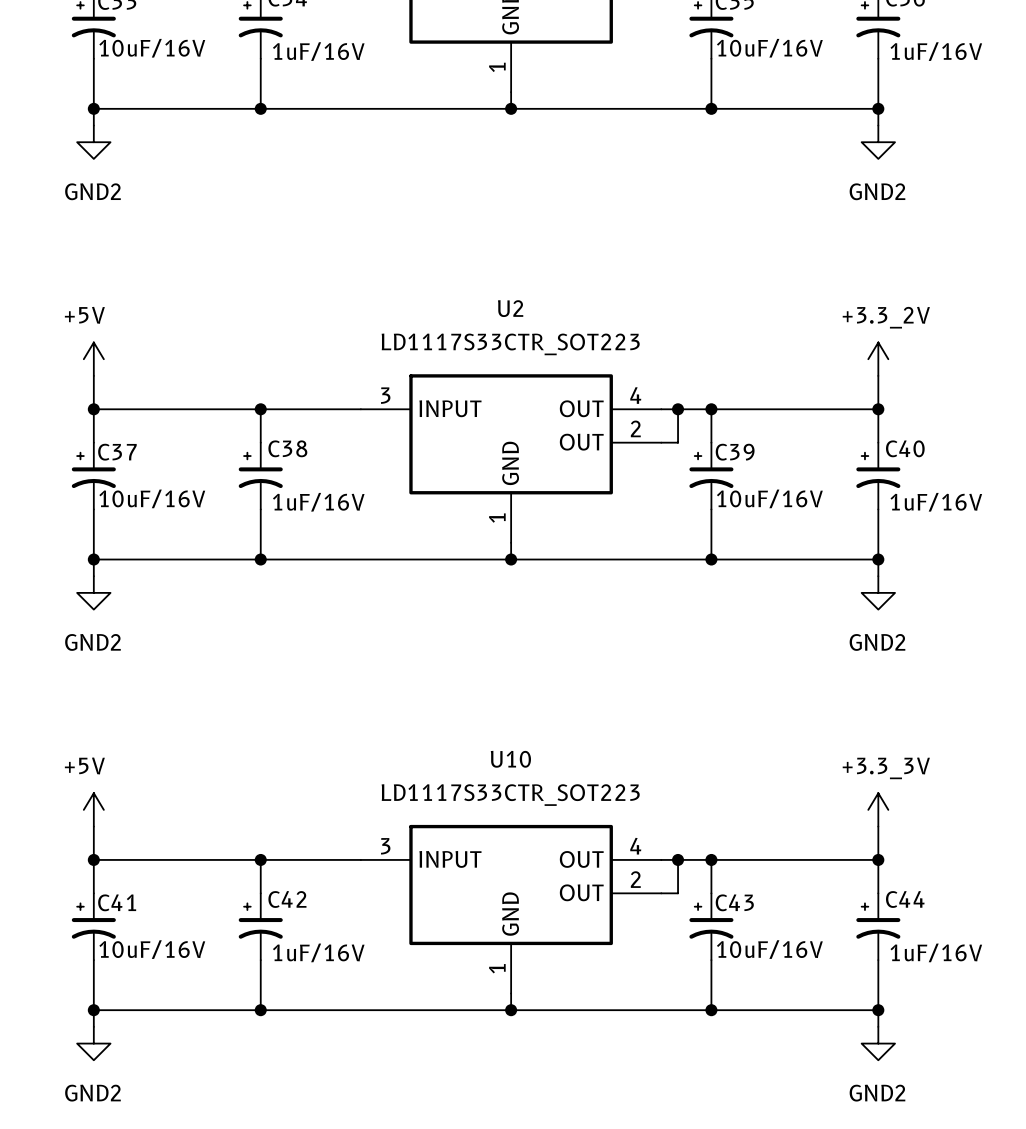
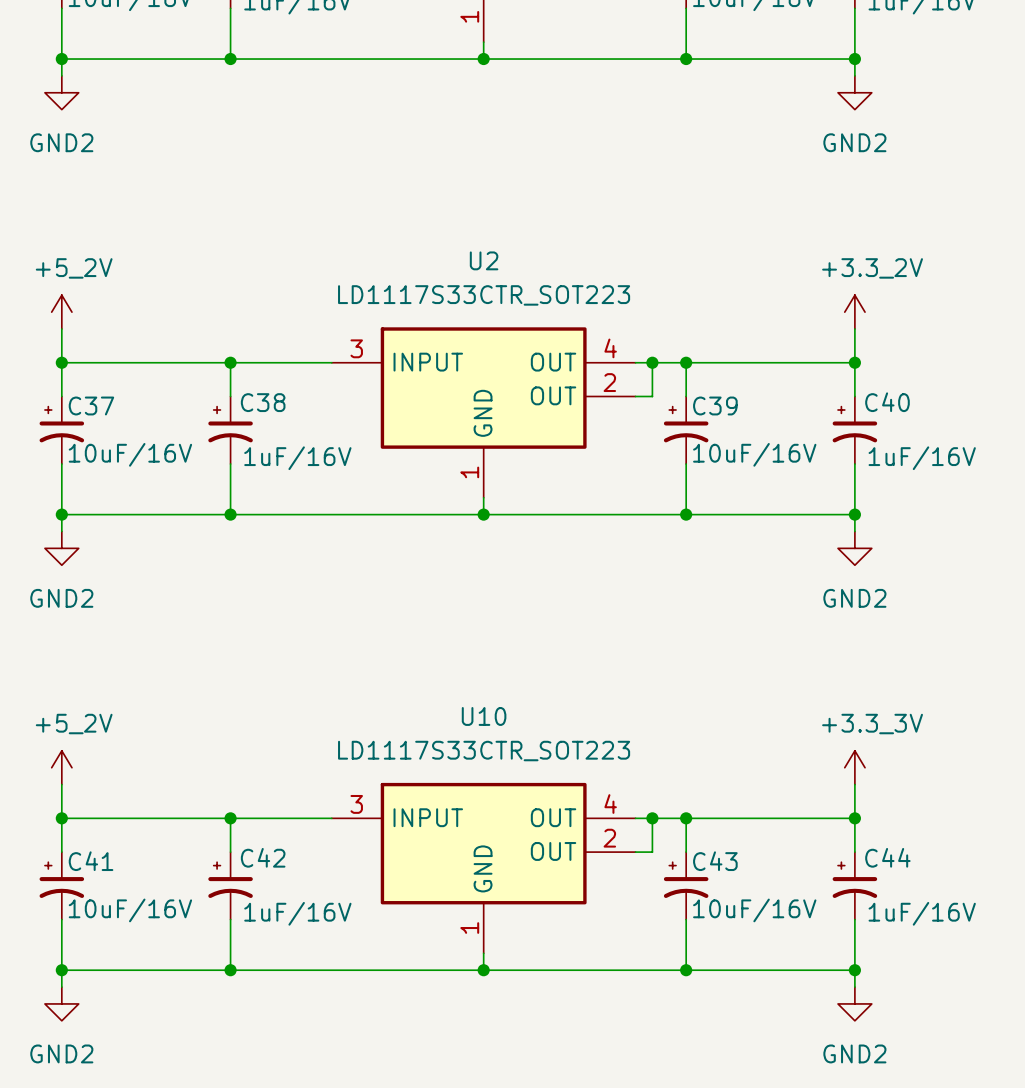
power symbol: +5V (93, 359) -> +5_2V (61, 312)
power symbol: +5V (93, 809) -> +5_2V (61, 767)

